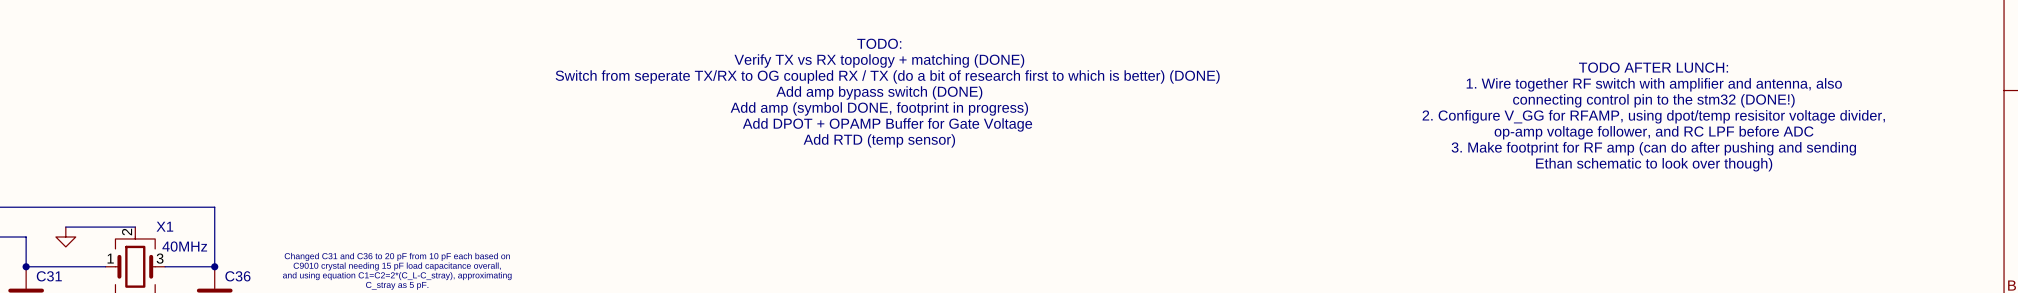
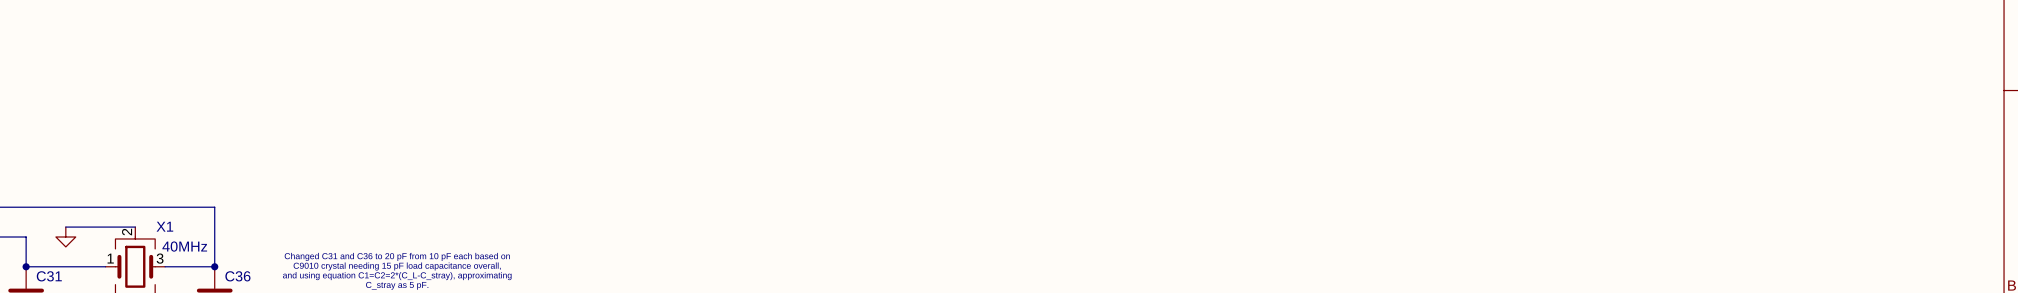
text: TODO: (879, 43) -> none
text: Verify TX vs RX topology + matching (DONE) (879, 61) -> none
text: TODO AFTER LUNCH: (1653, 67) -> none
text: Switch from seperate TX/RX to OG coupled RX / TX (do a bit of research first to which is better) (DONE) (887, 76) -> none
text: 1. Wire together RF switch with amplifier and antenna, also (1654, 84) -> none
text: Add amp bypass switch (DONE) (879, 92) -> none
text: connecting control pin to the stm32 (DONE!) (1653, 100) -> none
text: Add amp (symbol DONE, footprint in progress) (879, 108) -> none
text: 2. Configure V_GG for RFAMP, using dpot/temp resisitor voltage divider, (1653, 116) -> none
text: Add DPOT + OPAMP Buffer for Gate Voltage (887, 124) -> none
text: op-amp voltage follower, and RC LPF before ADC (1654, 132) -> none
text: Add RTD (temp sensor) (879, 140) -> none
text: 3. Make footprint for RF amp (can do after pushing and sending (1653, 148) -> none
text: Ethan schematic to look over though) (1654, 164) -> none

